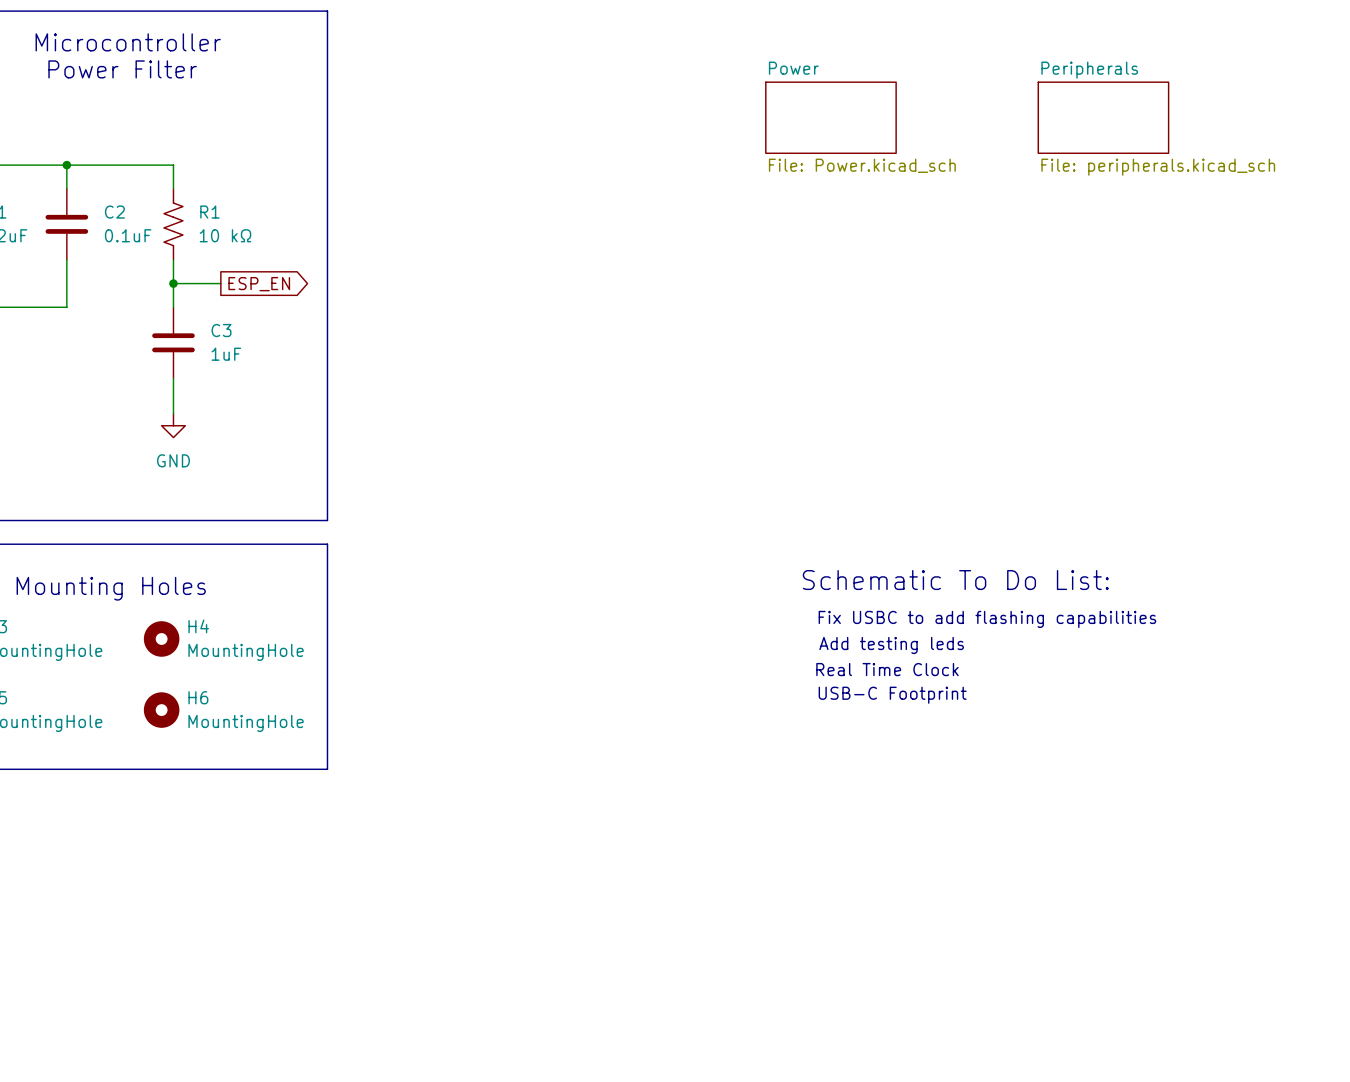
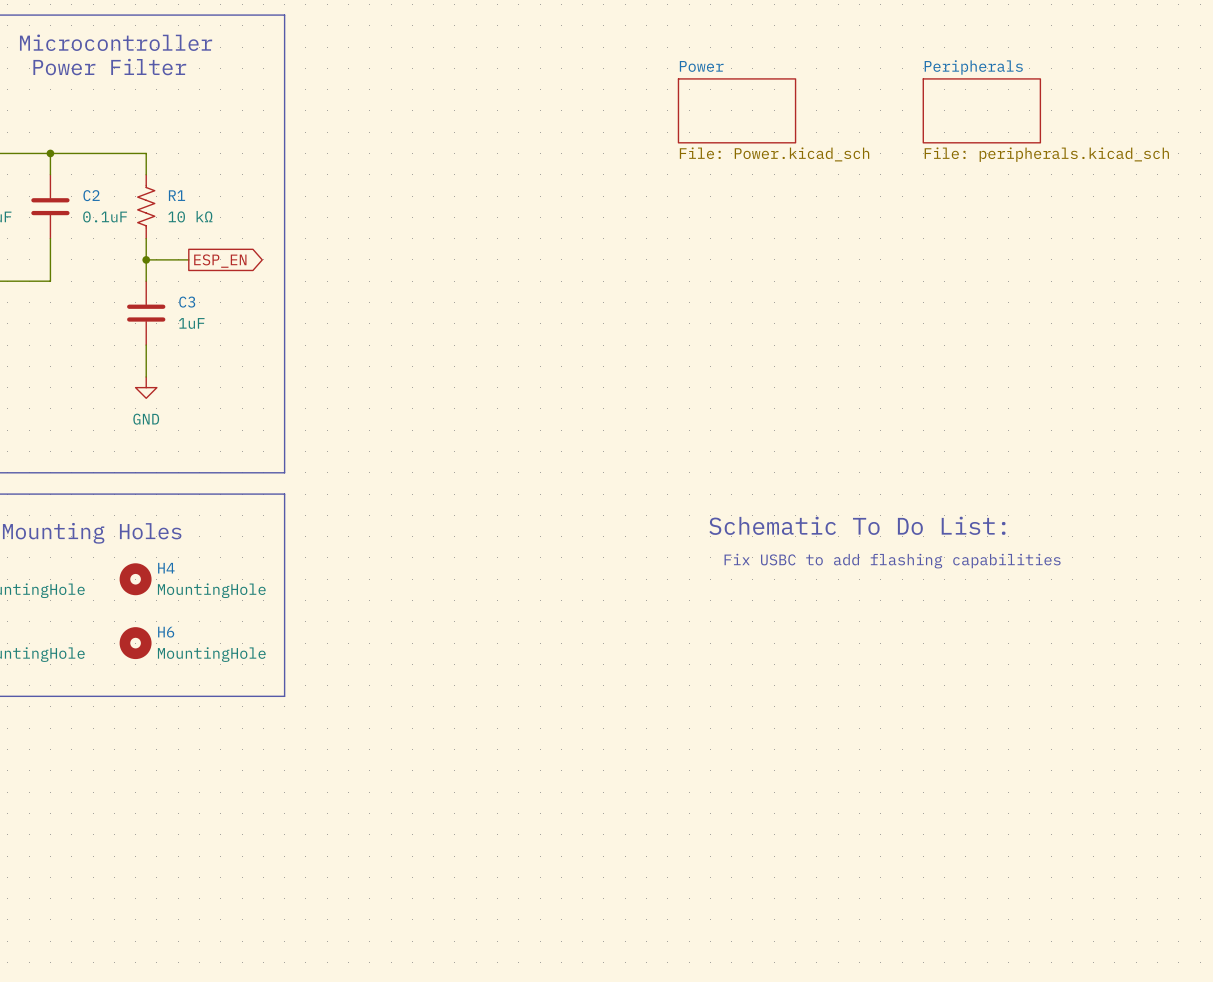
text: Add testing leds (891, 645) -> none
text: Real Time Clock (887, 669) -> none
text: USB-C Footprint (892, 695) -> none

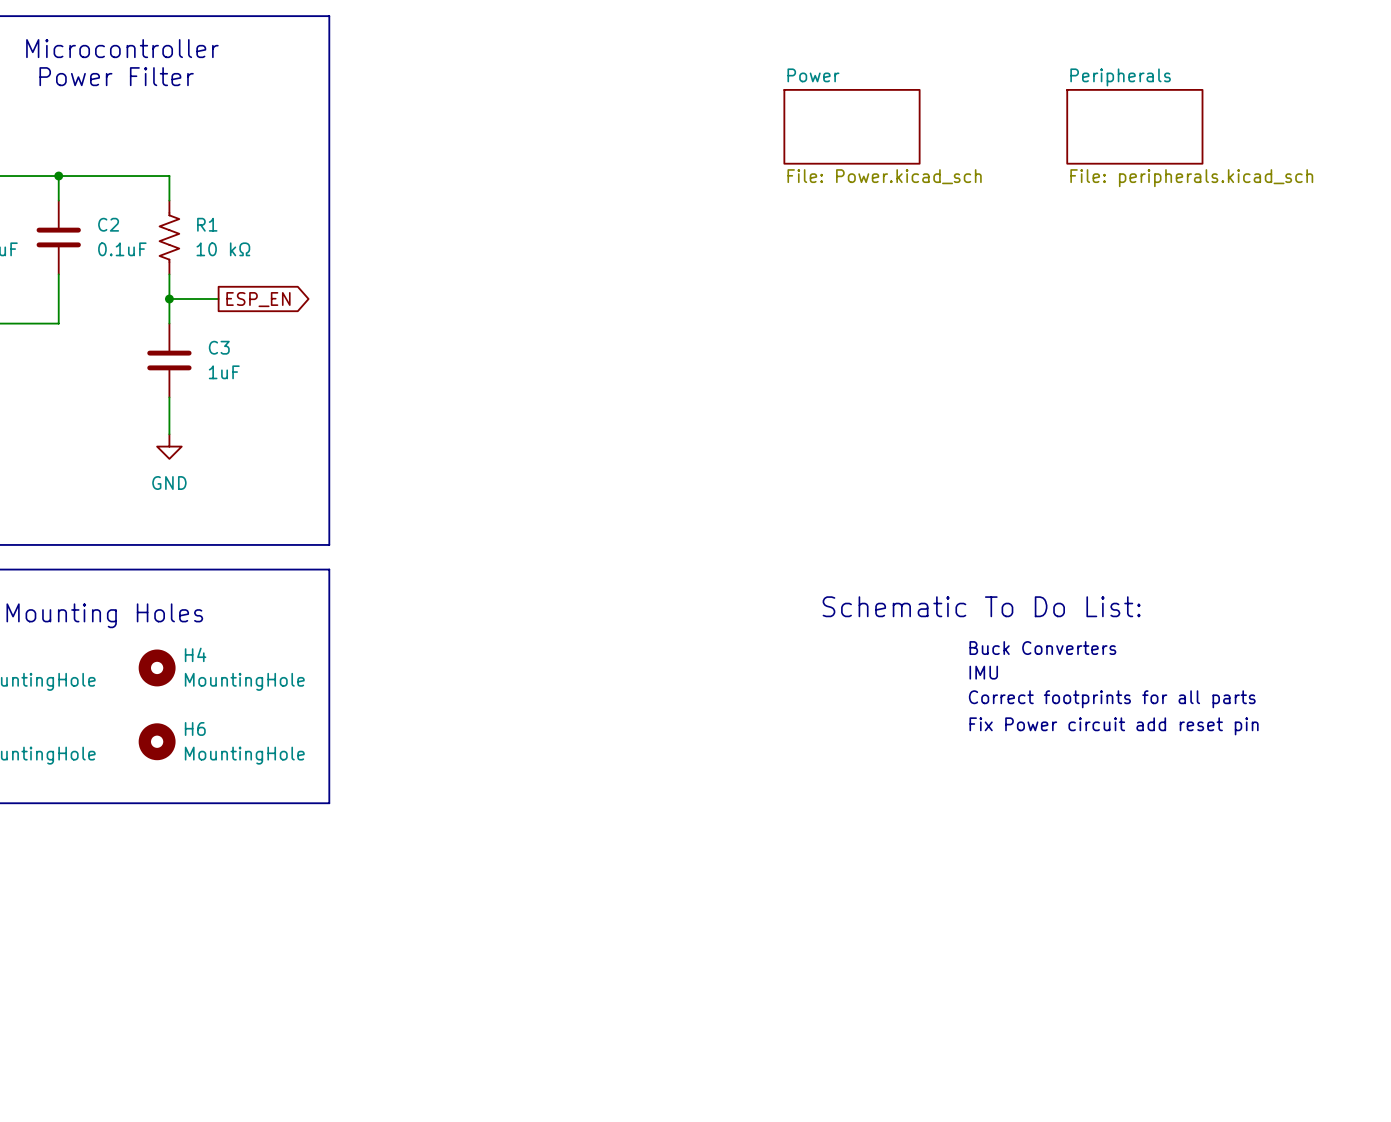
text: Fix USBC to add flashing capabilities (892, 561) -> none
text: none -> Buck Converters (1042, 648)
text: none -> IMU (983, 672)
text: none -> Correct footprints for all parts (1112, 699)
text: none -> Fix Power circuit add reset pin (1114, 726)

